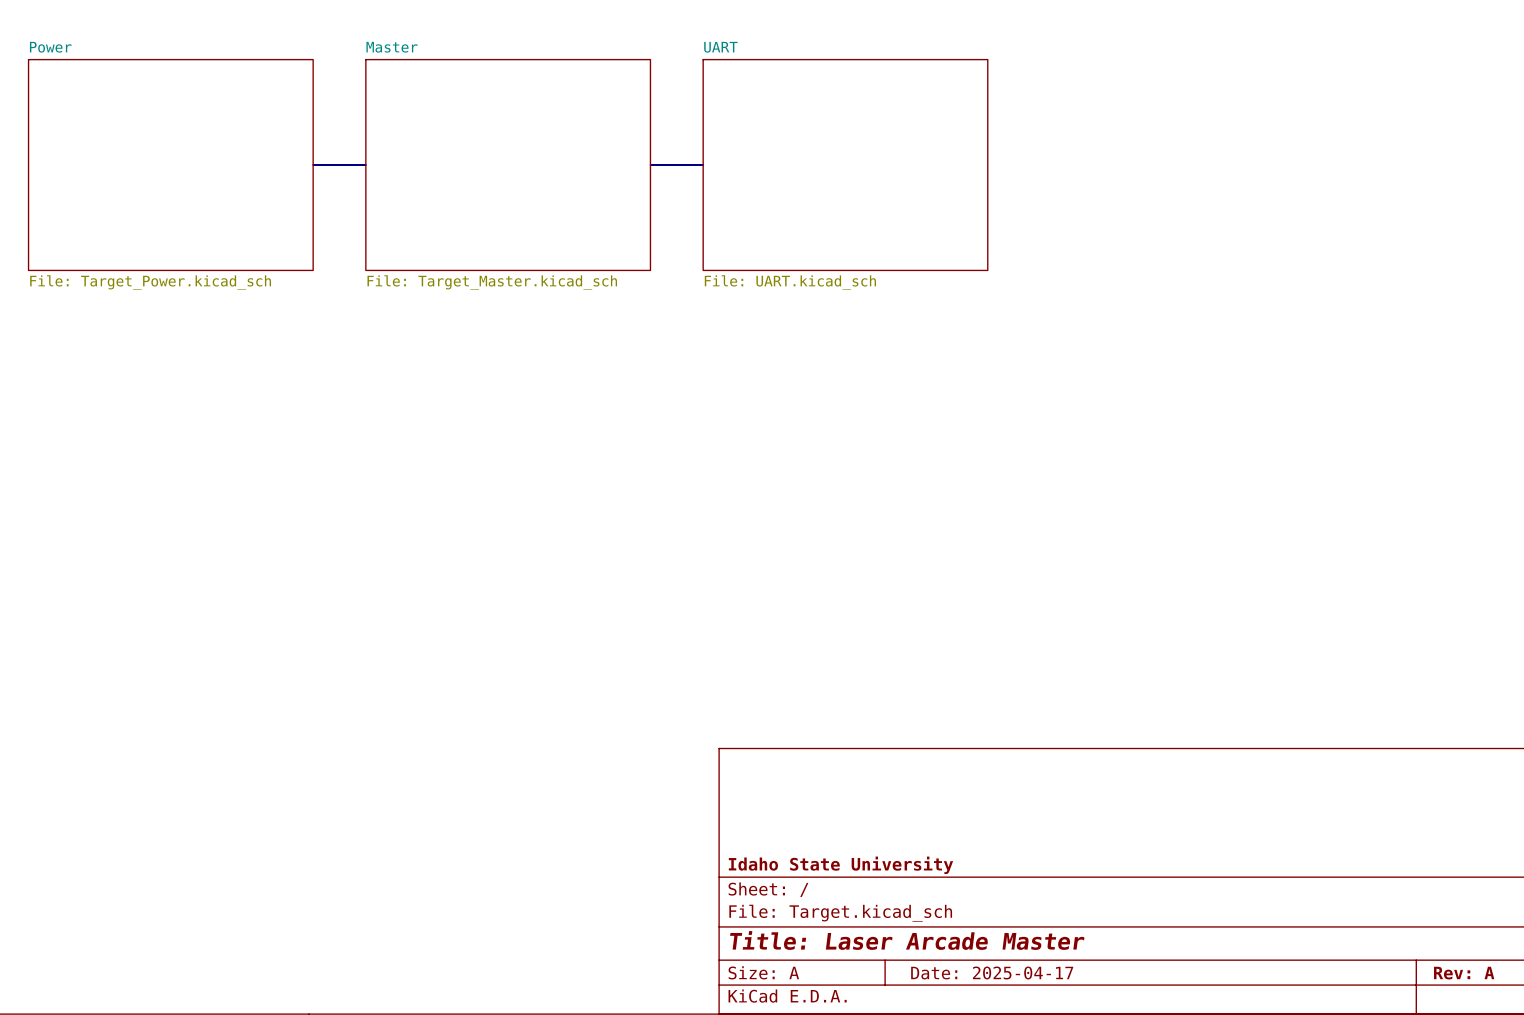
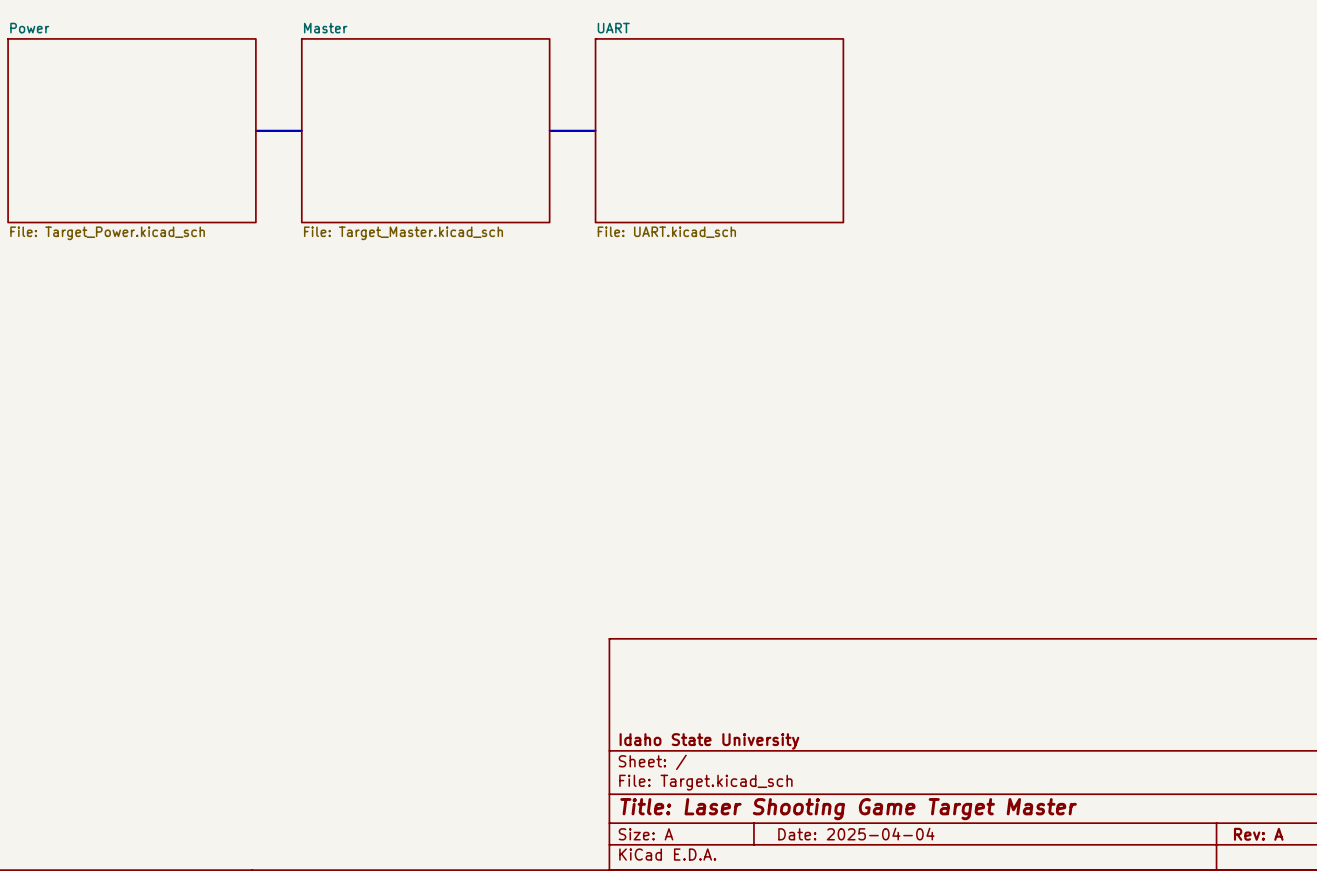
title block: Title: Laser Arcade Master (907, 940) -> Title: Laser Shooting Game Target Master (848, 809)
title block: Date: 2025-04-17 (992, 972) -> Date: 2025-04-04 (856, 834)

